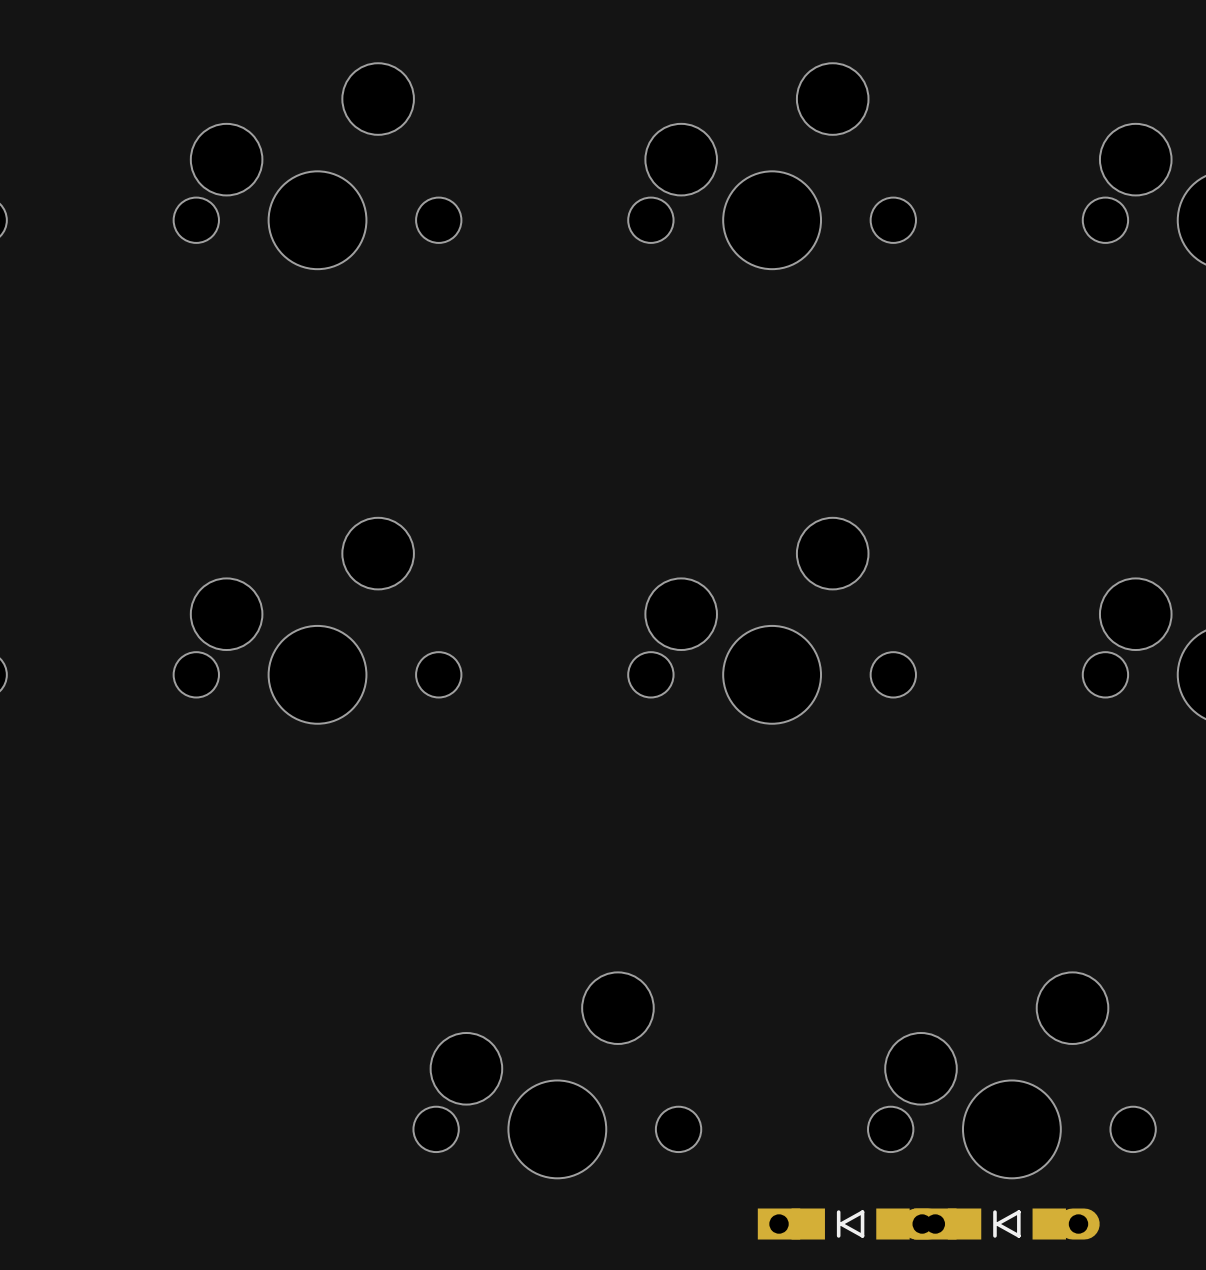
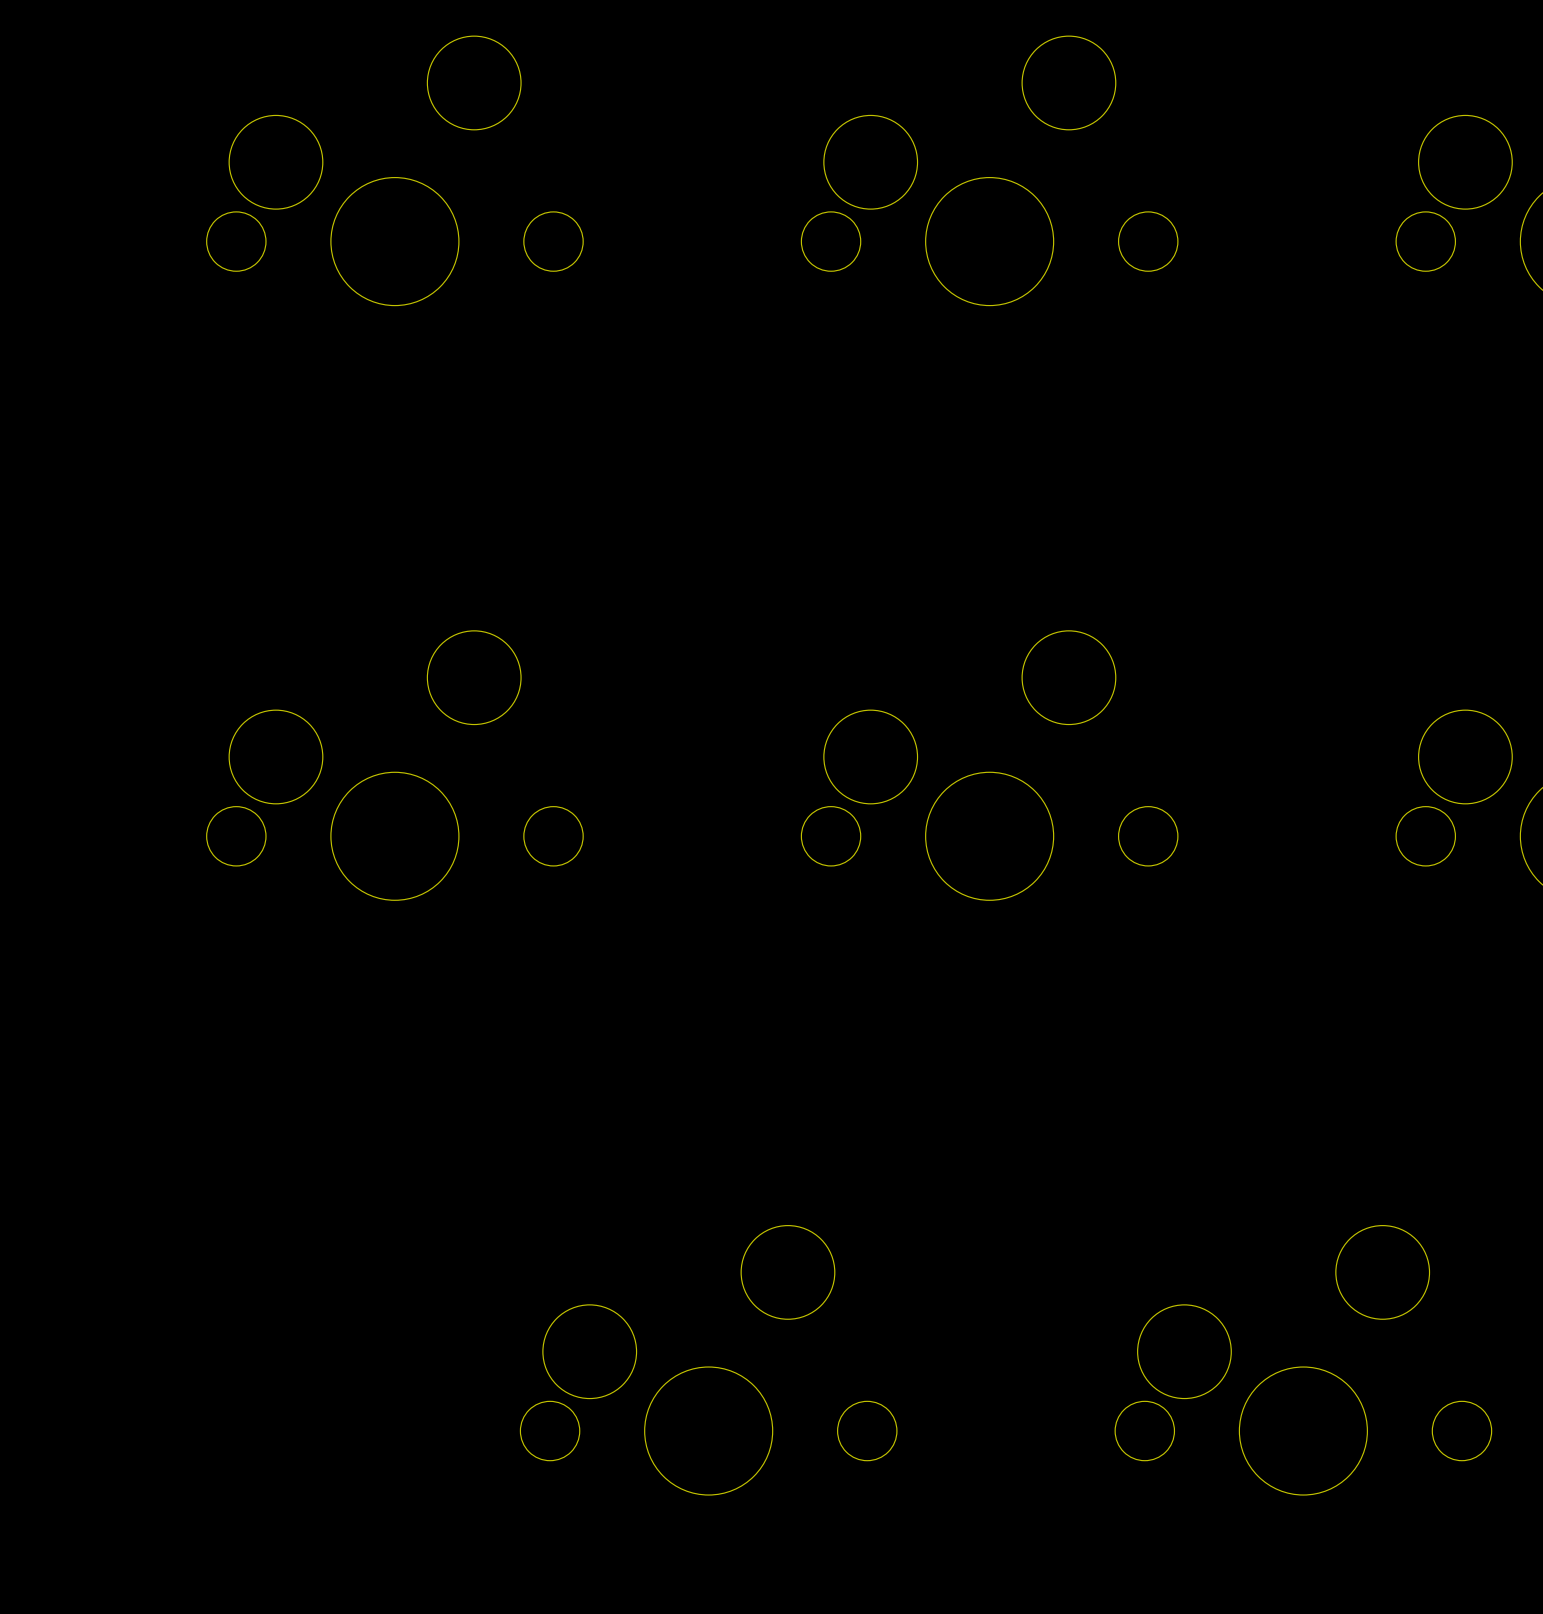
part: (850, 1224) -> none
part: (1006, 1224) -> none

